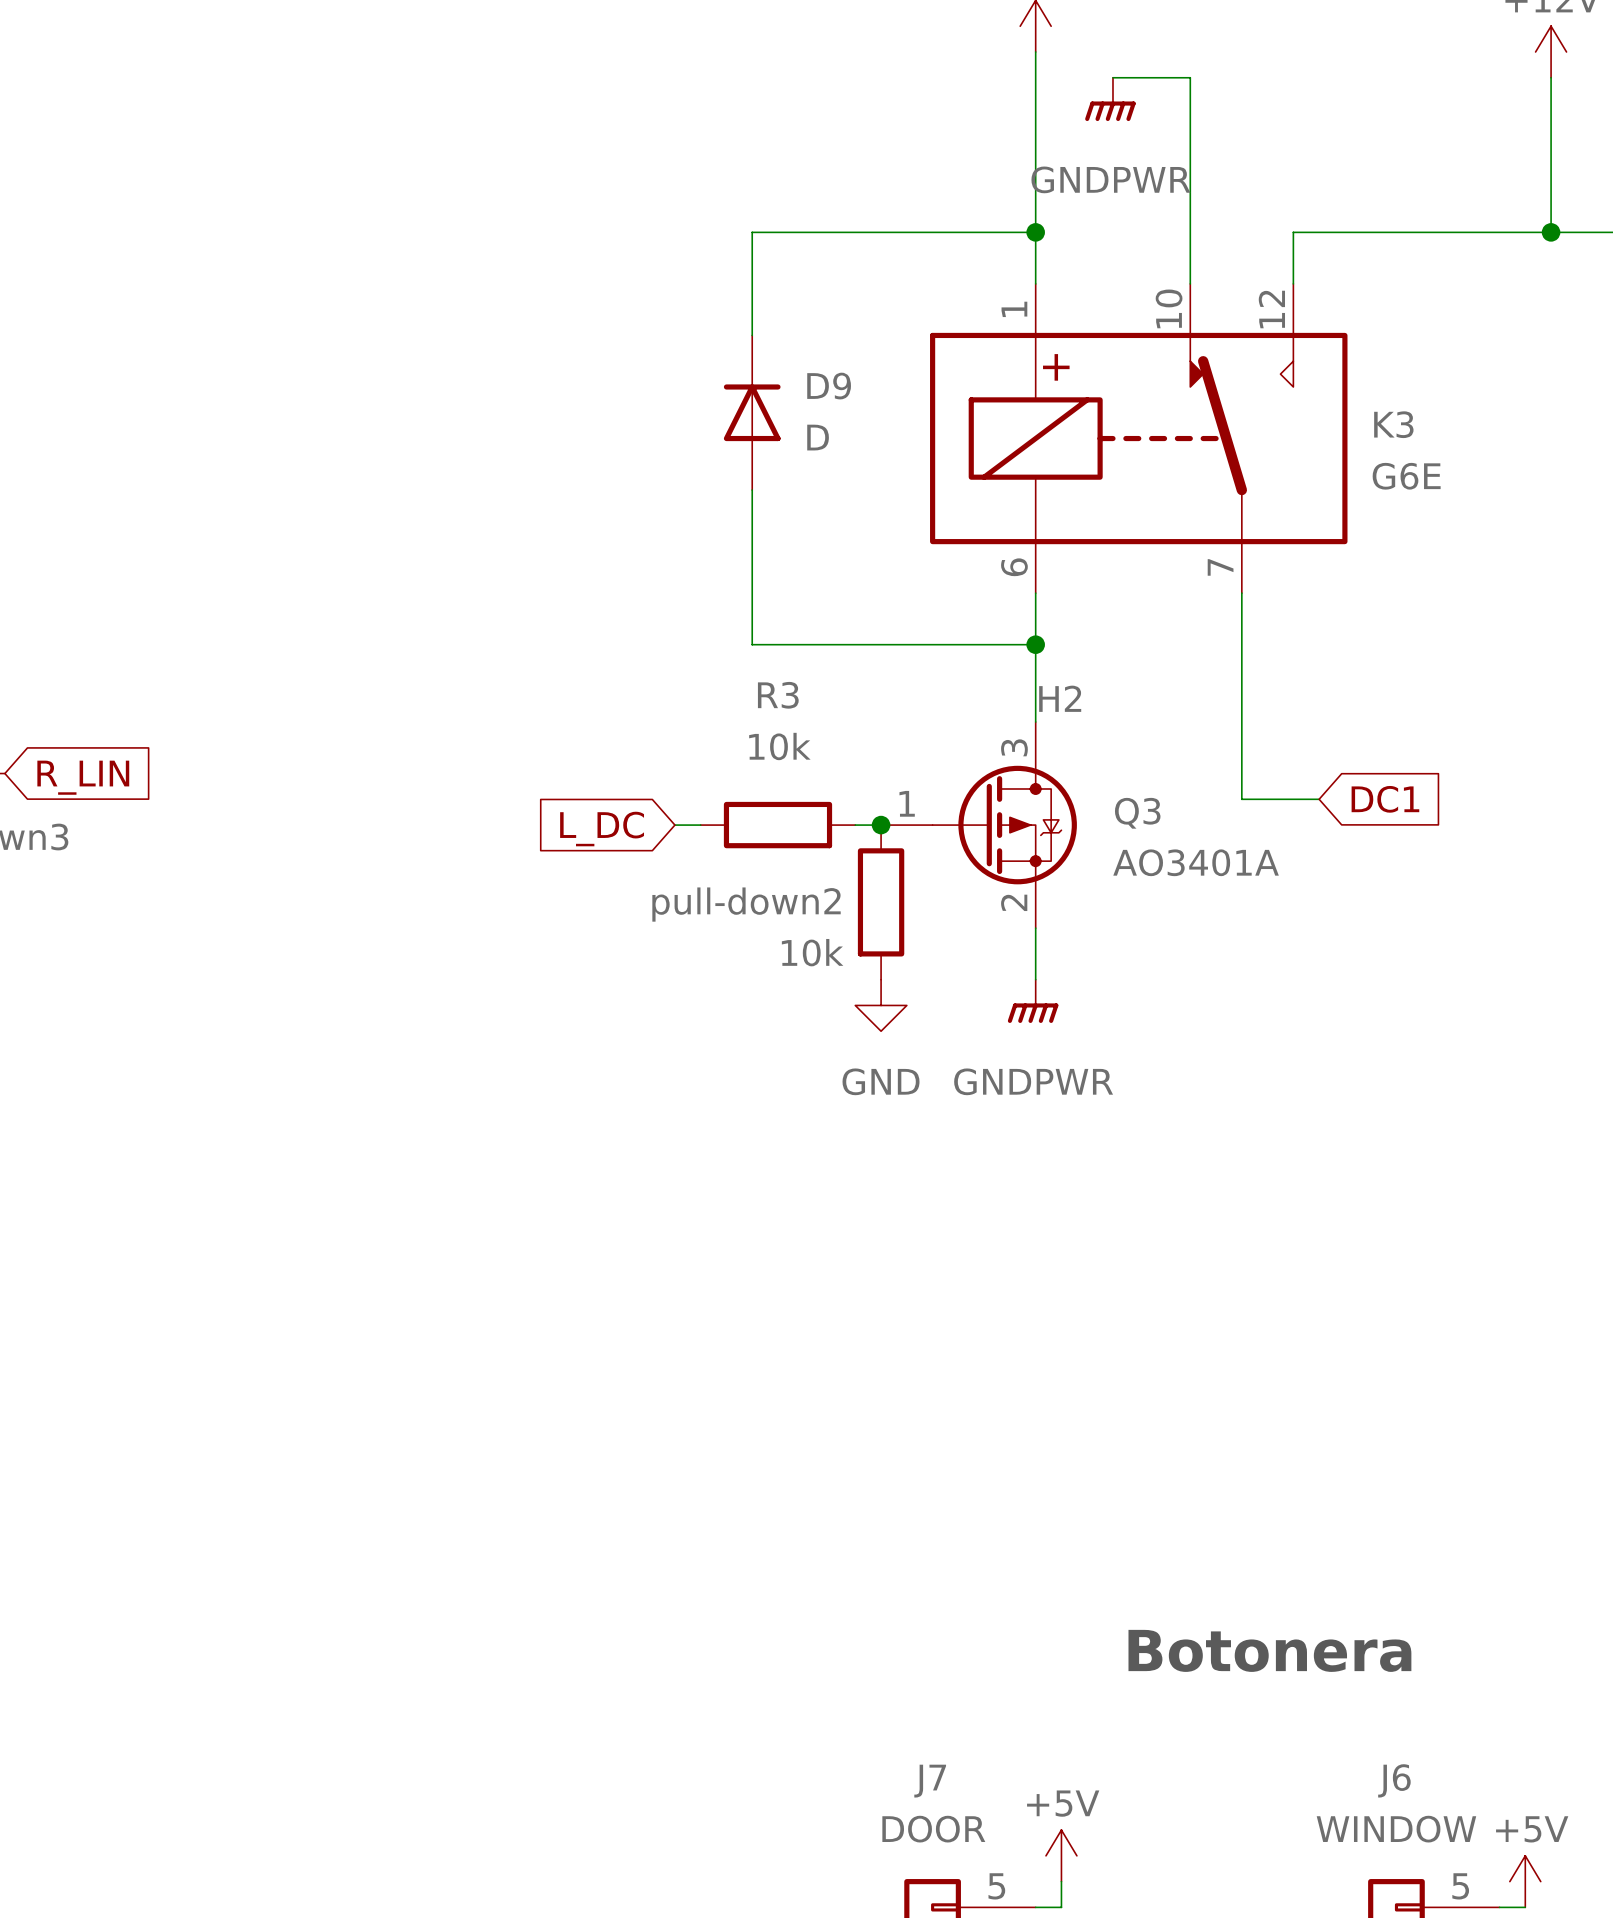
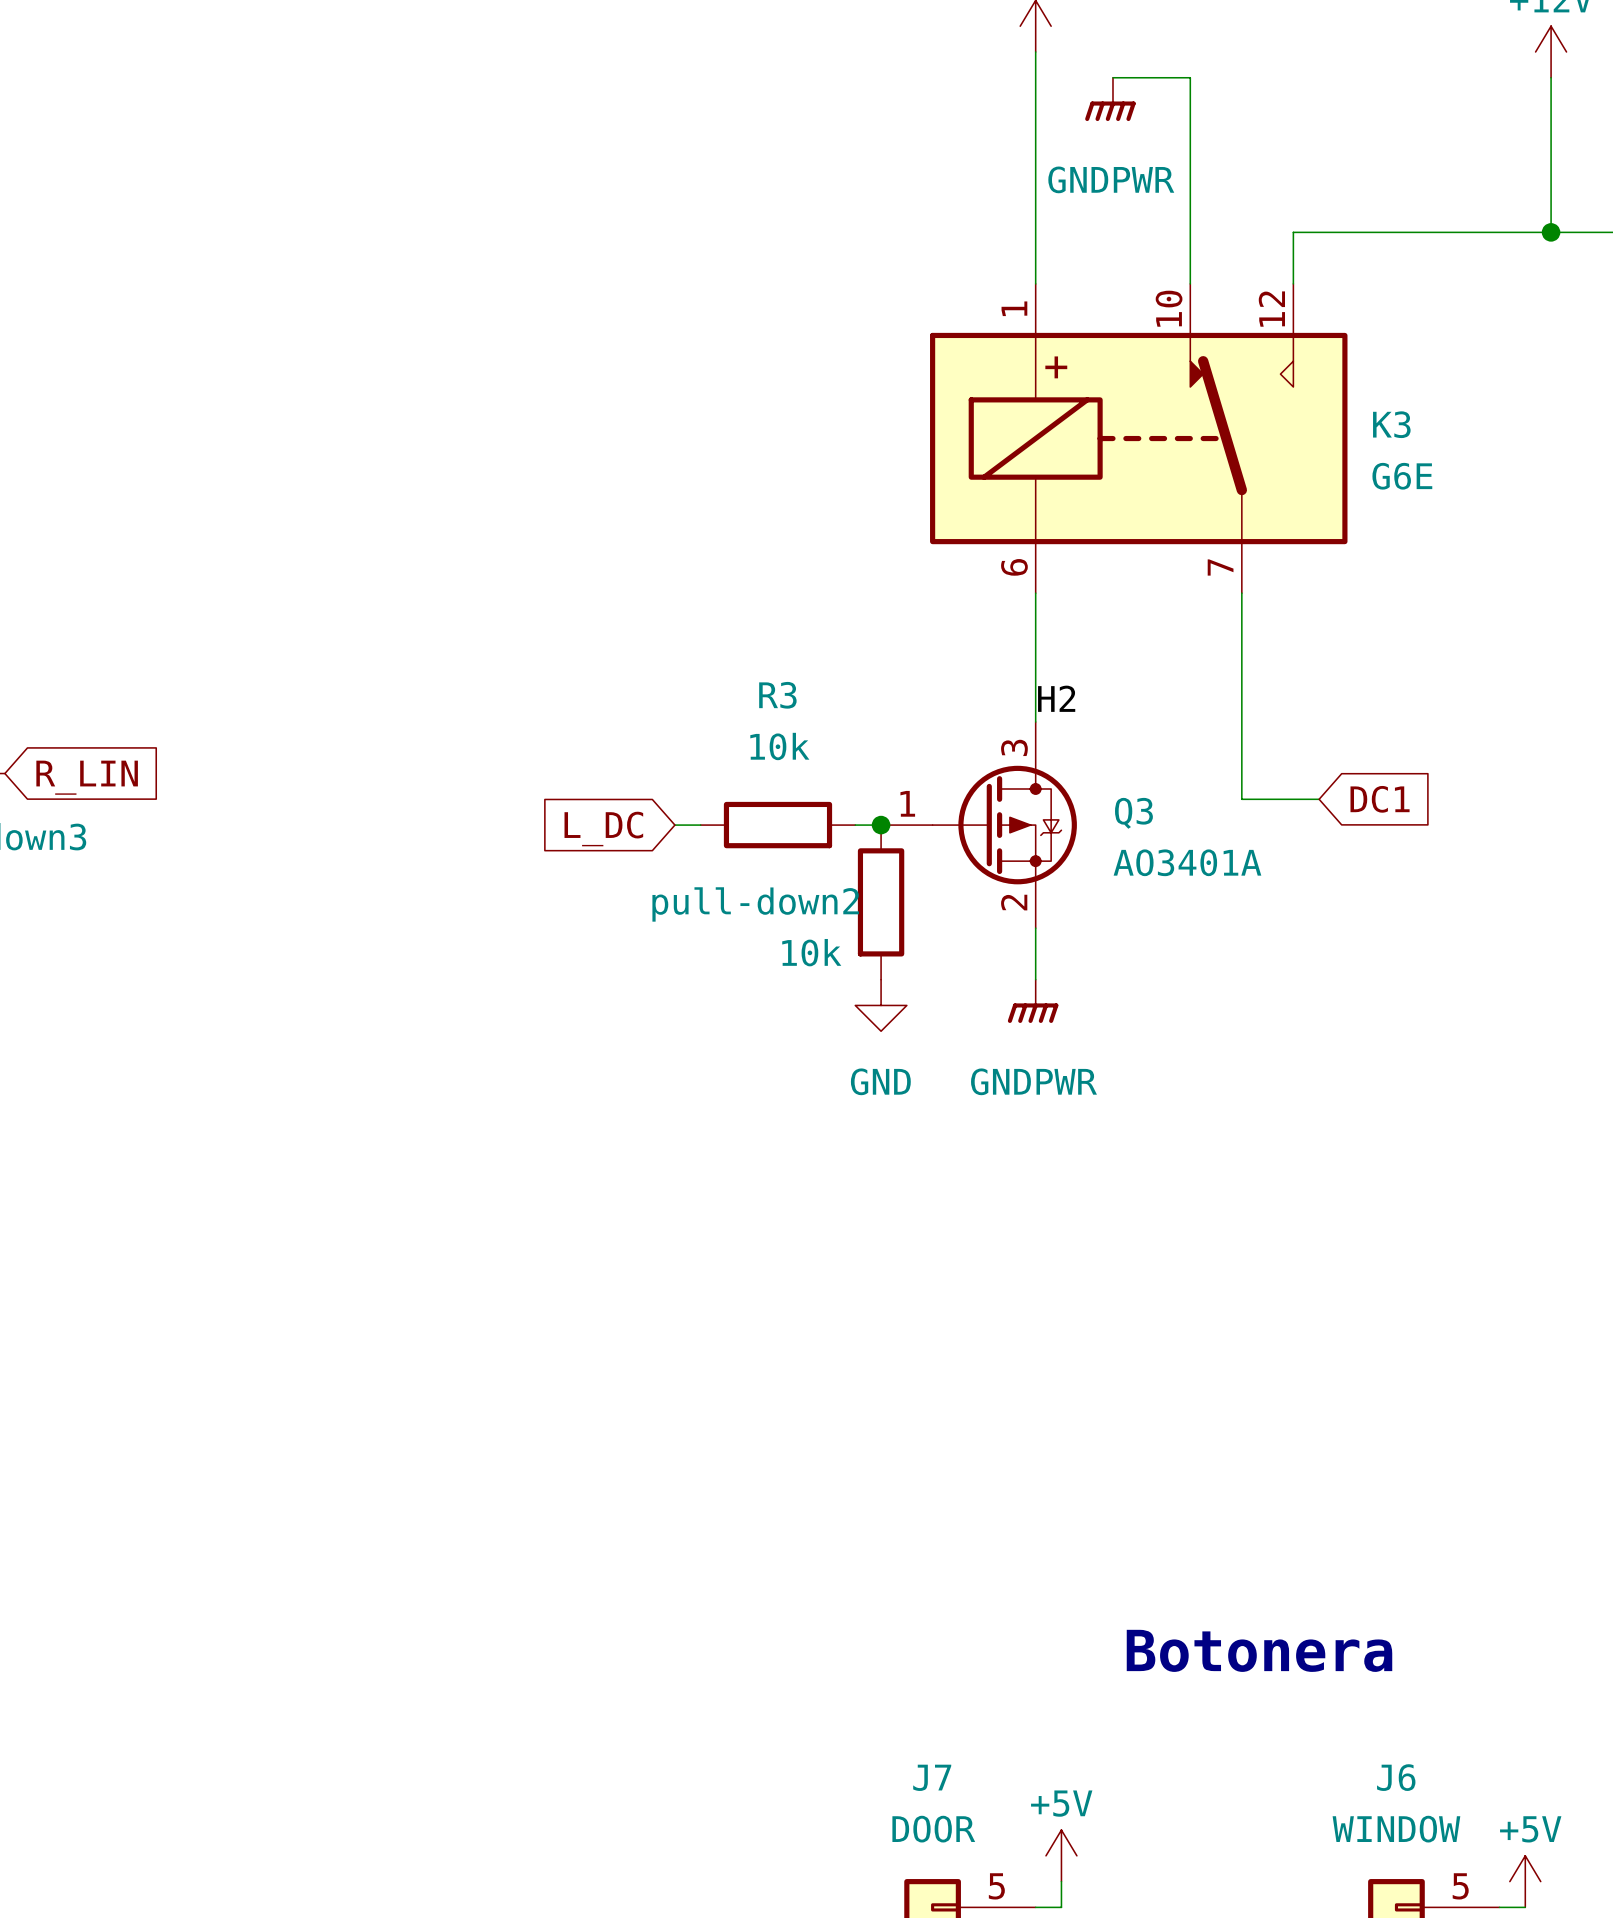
wire: (1035, 232) (752, 232) (752, 335) -> none
junction: (1035, 232) -> none
D9: D (752, 412) -> none
wire: (752, 490) (752, 644) (1035, 644) -> none
junction: (1035, 644) -> none

